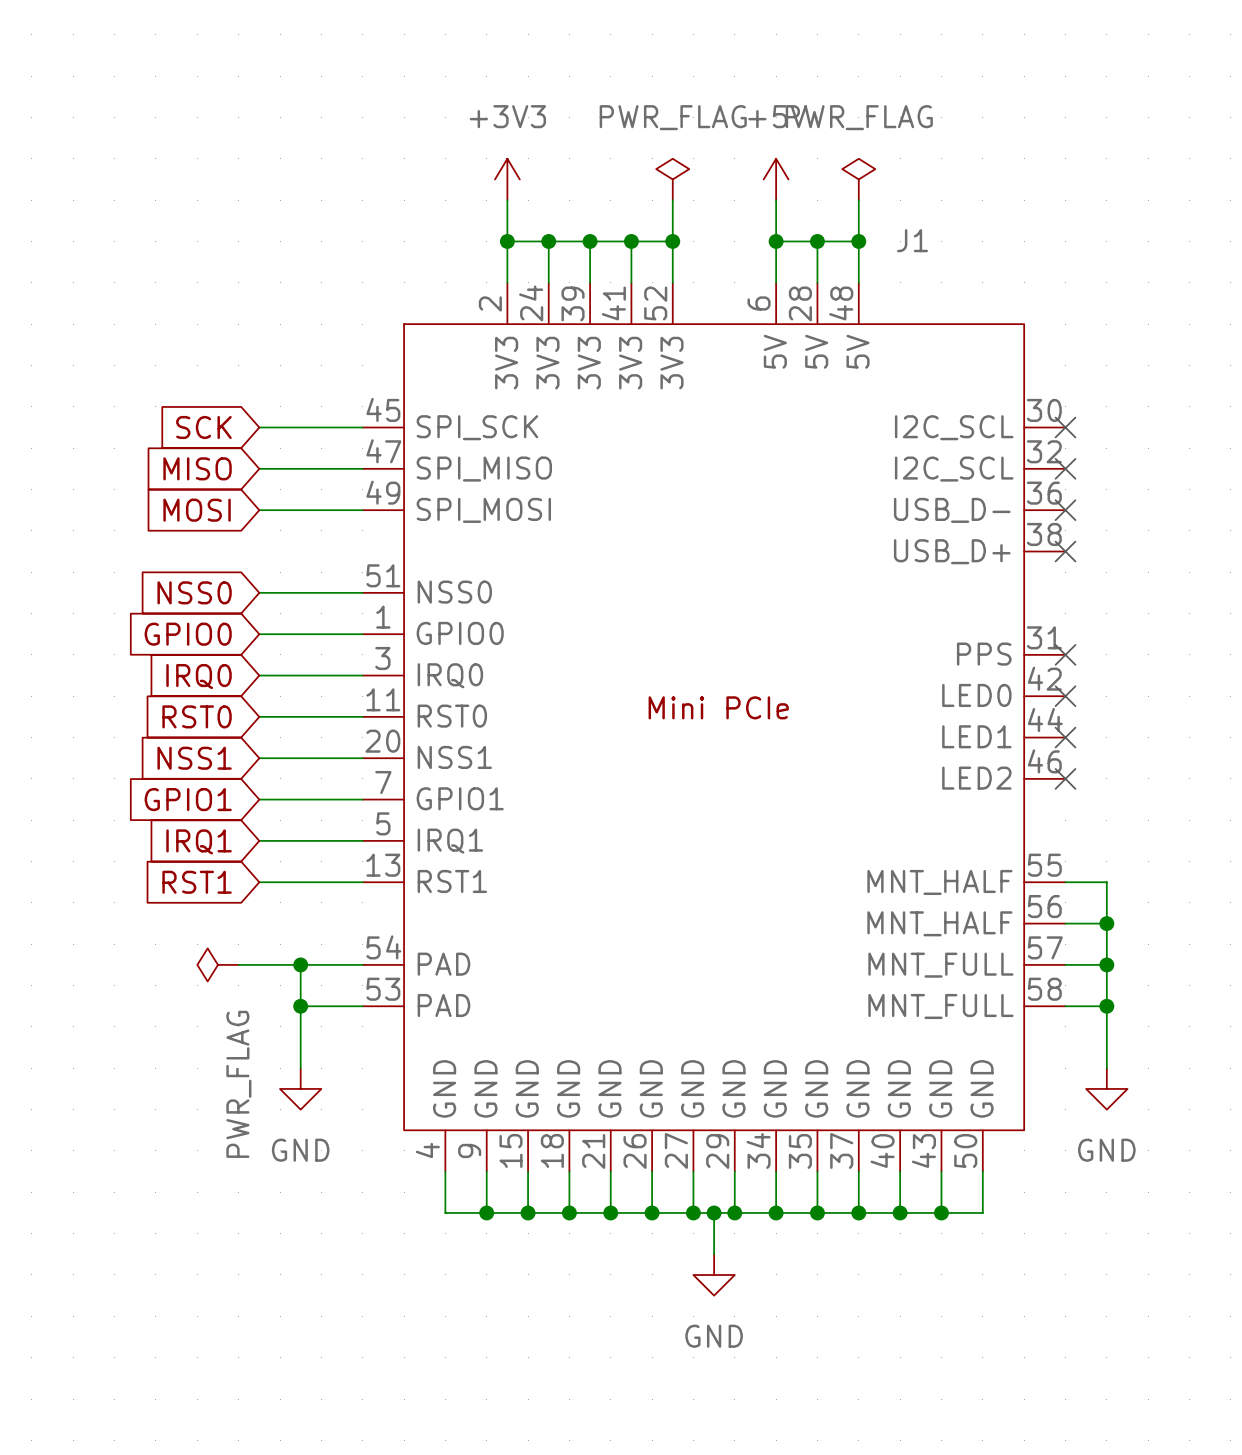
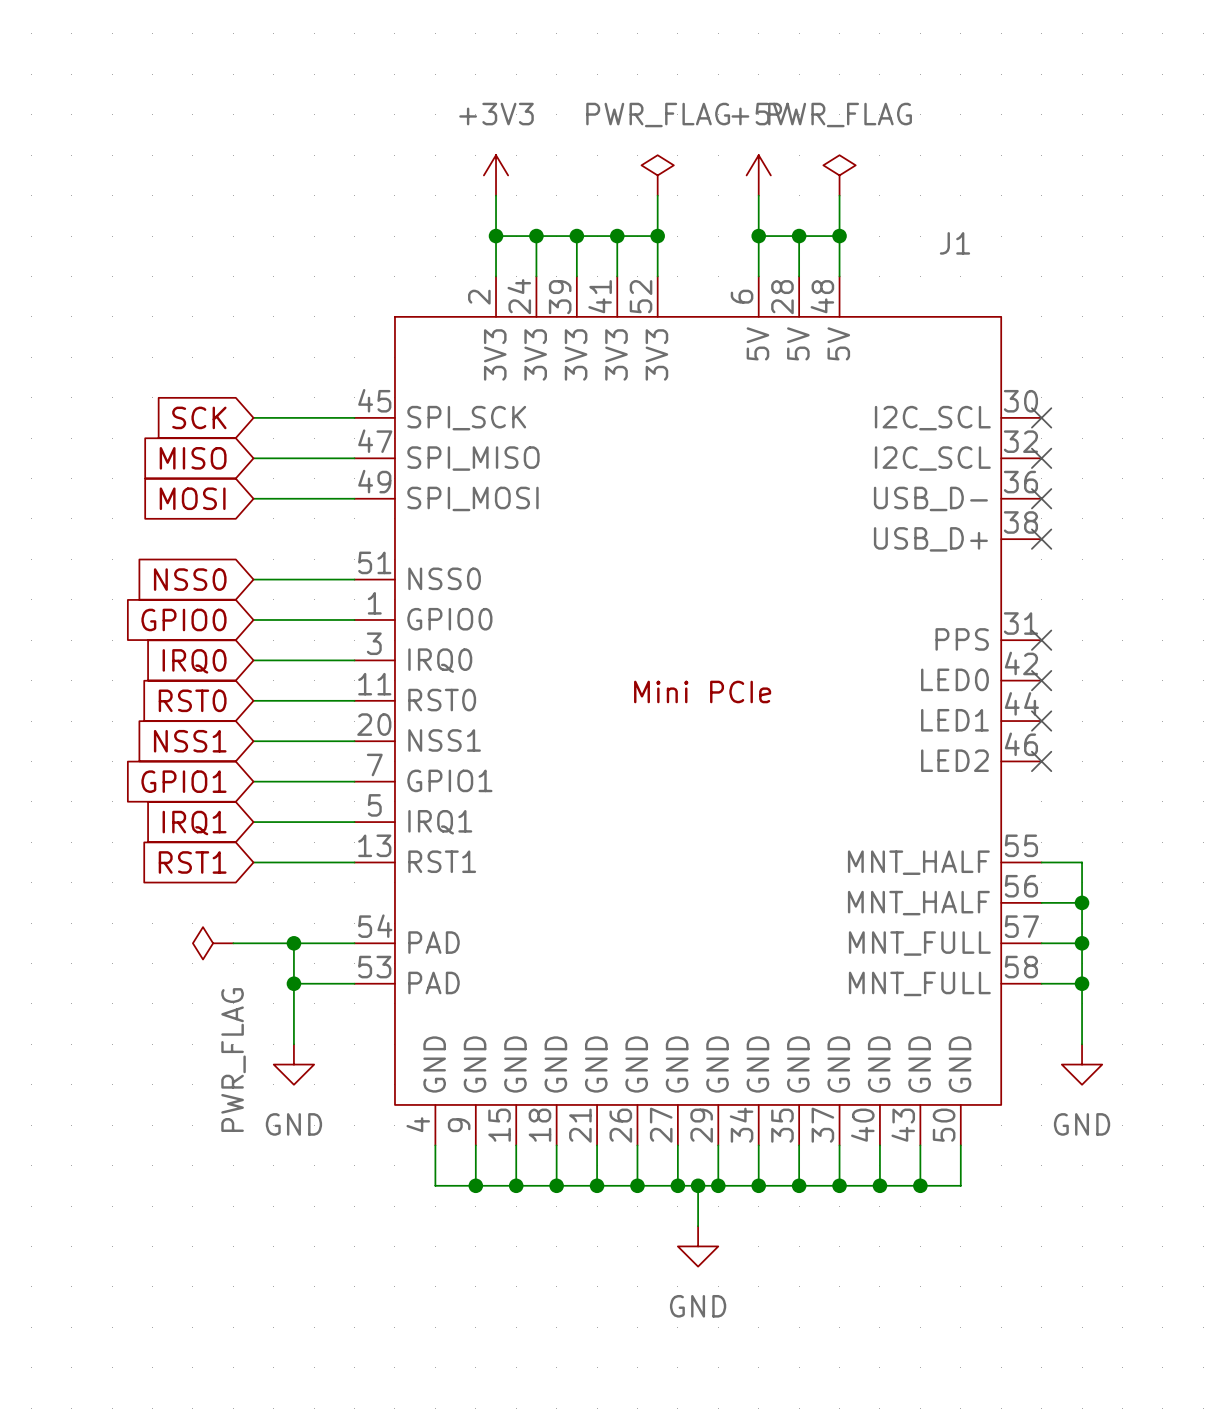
J1 name position: J1 (912, 240) -> J1 (954, 243)

